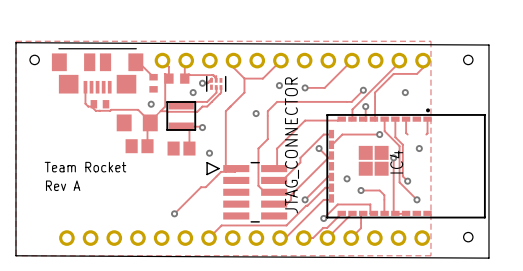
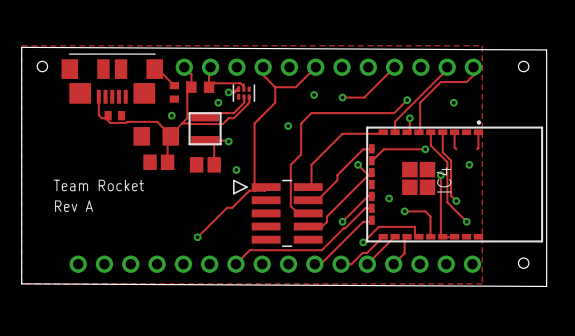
JTAG_CONNECTOR name: JTAG_CONNECTOR (292, 145) -> none

